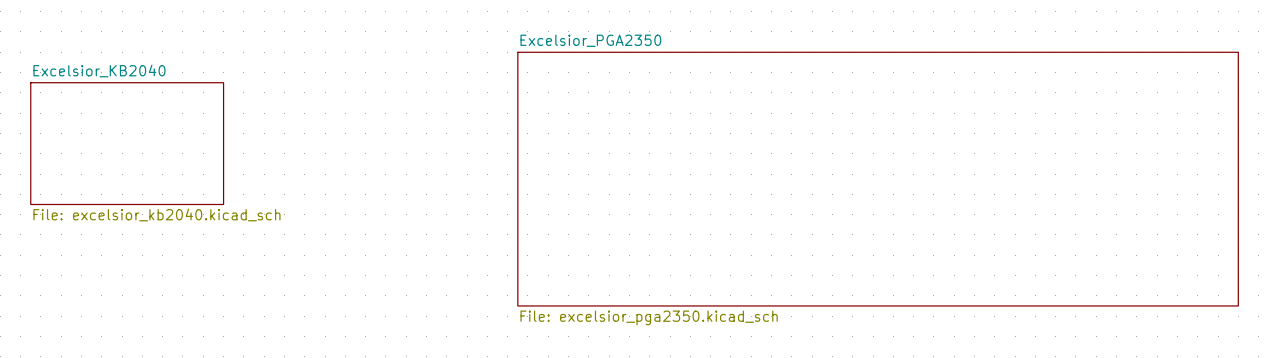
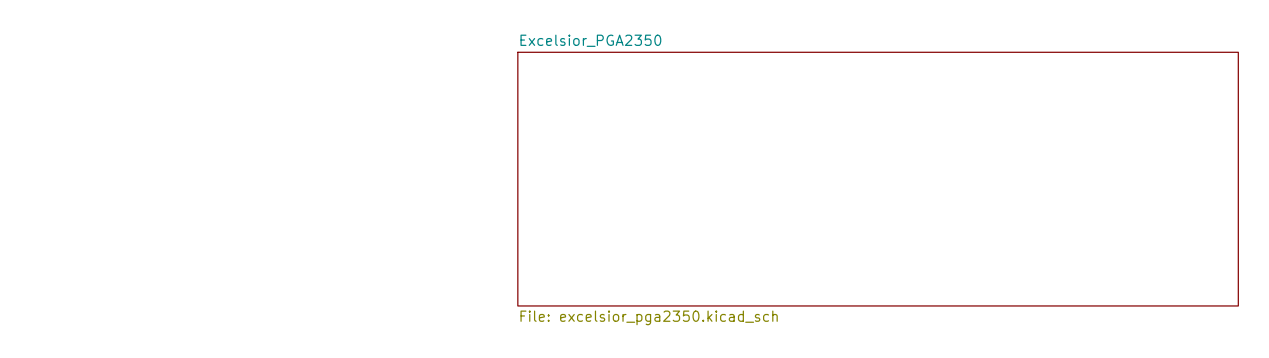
sheet Excelsior_KB2040: File: excelsior_kb2040.kicad_sch (127, 143) -> none

